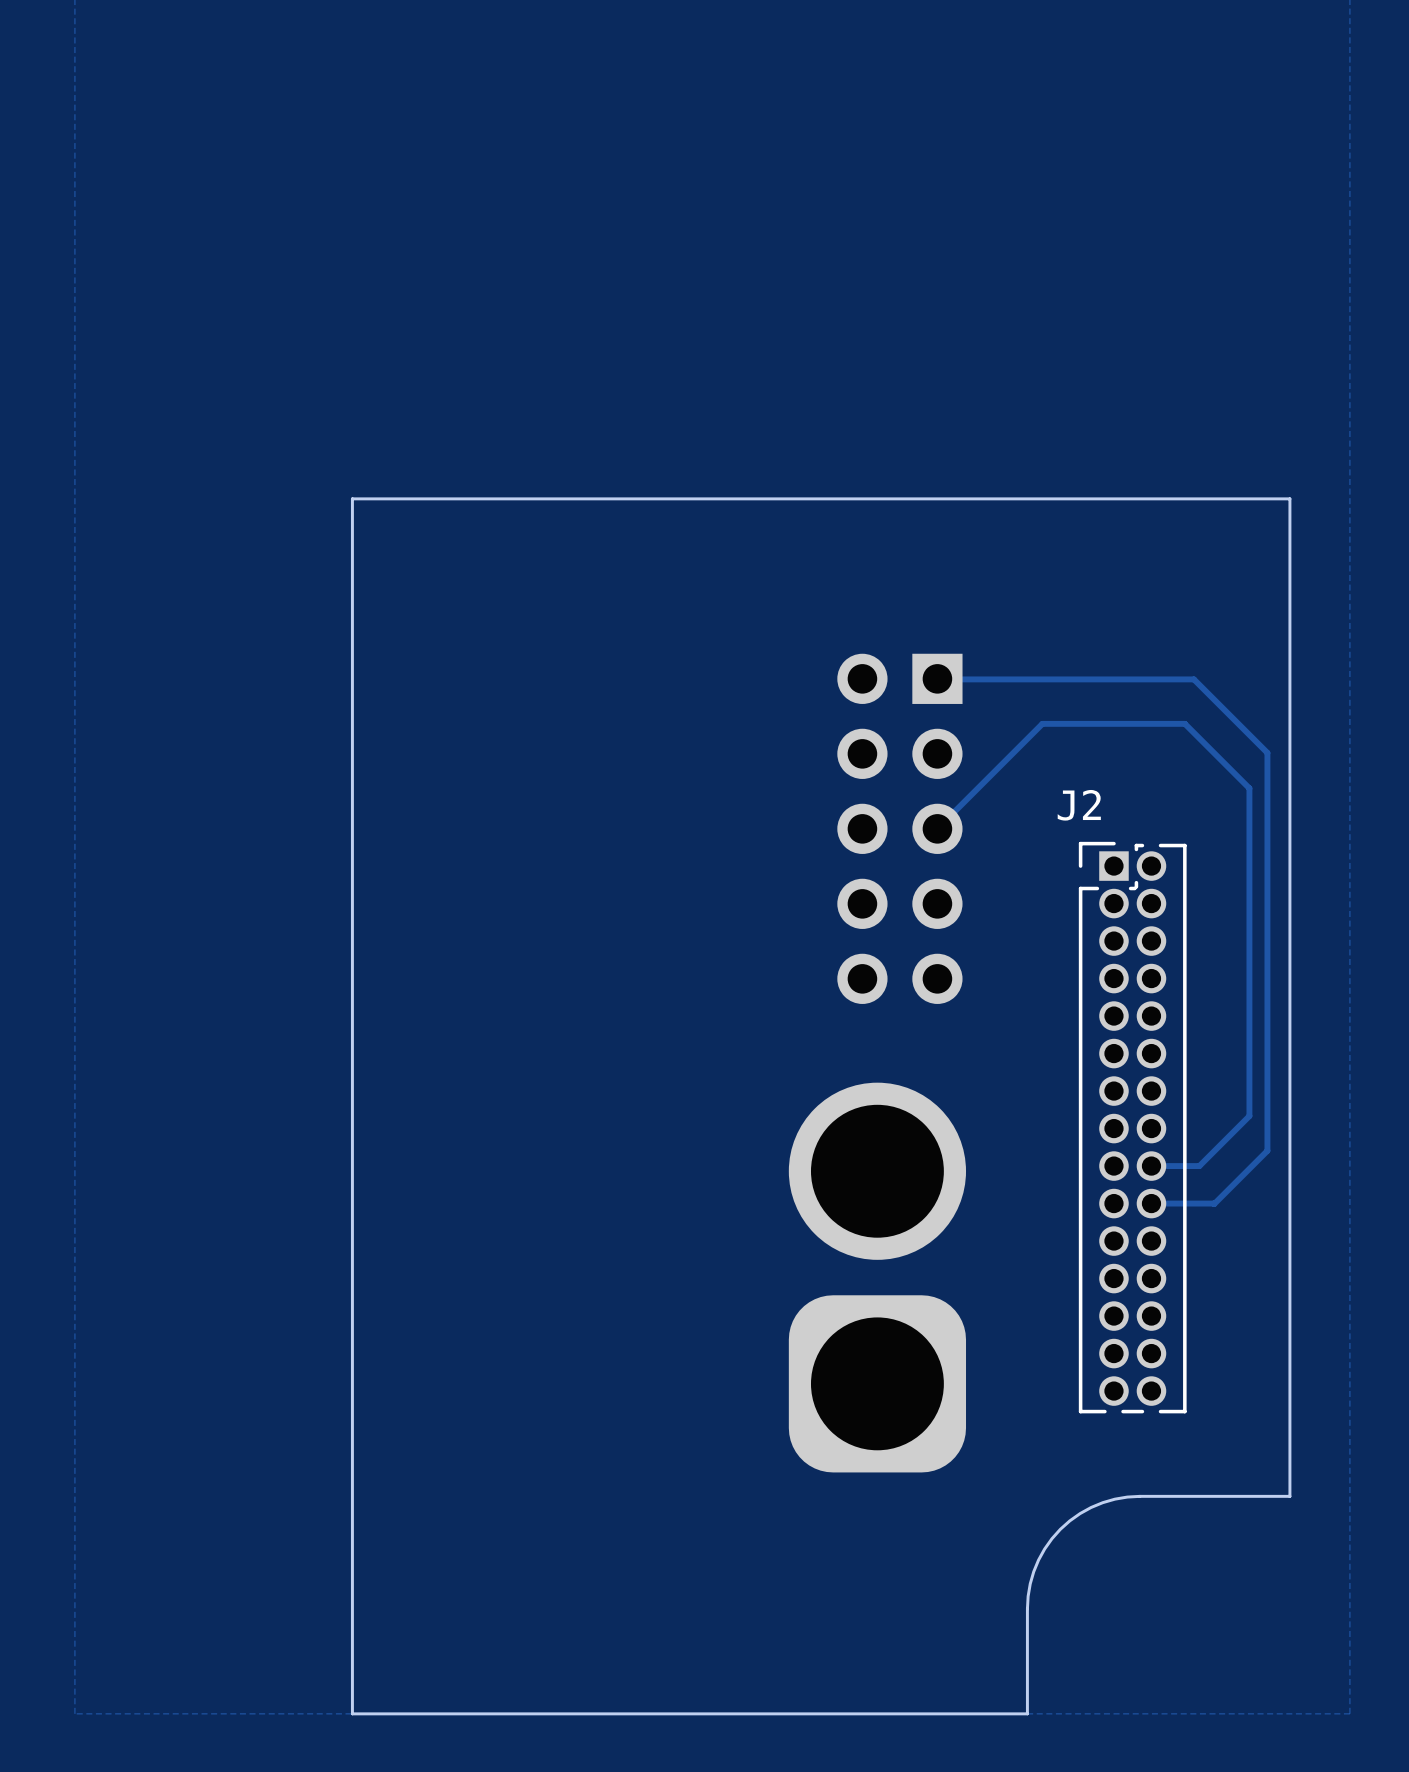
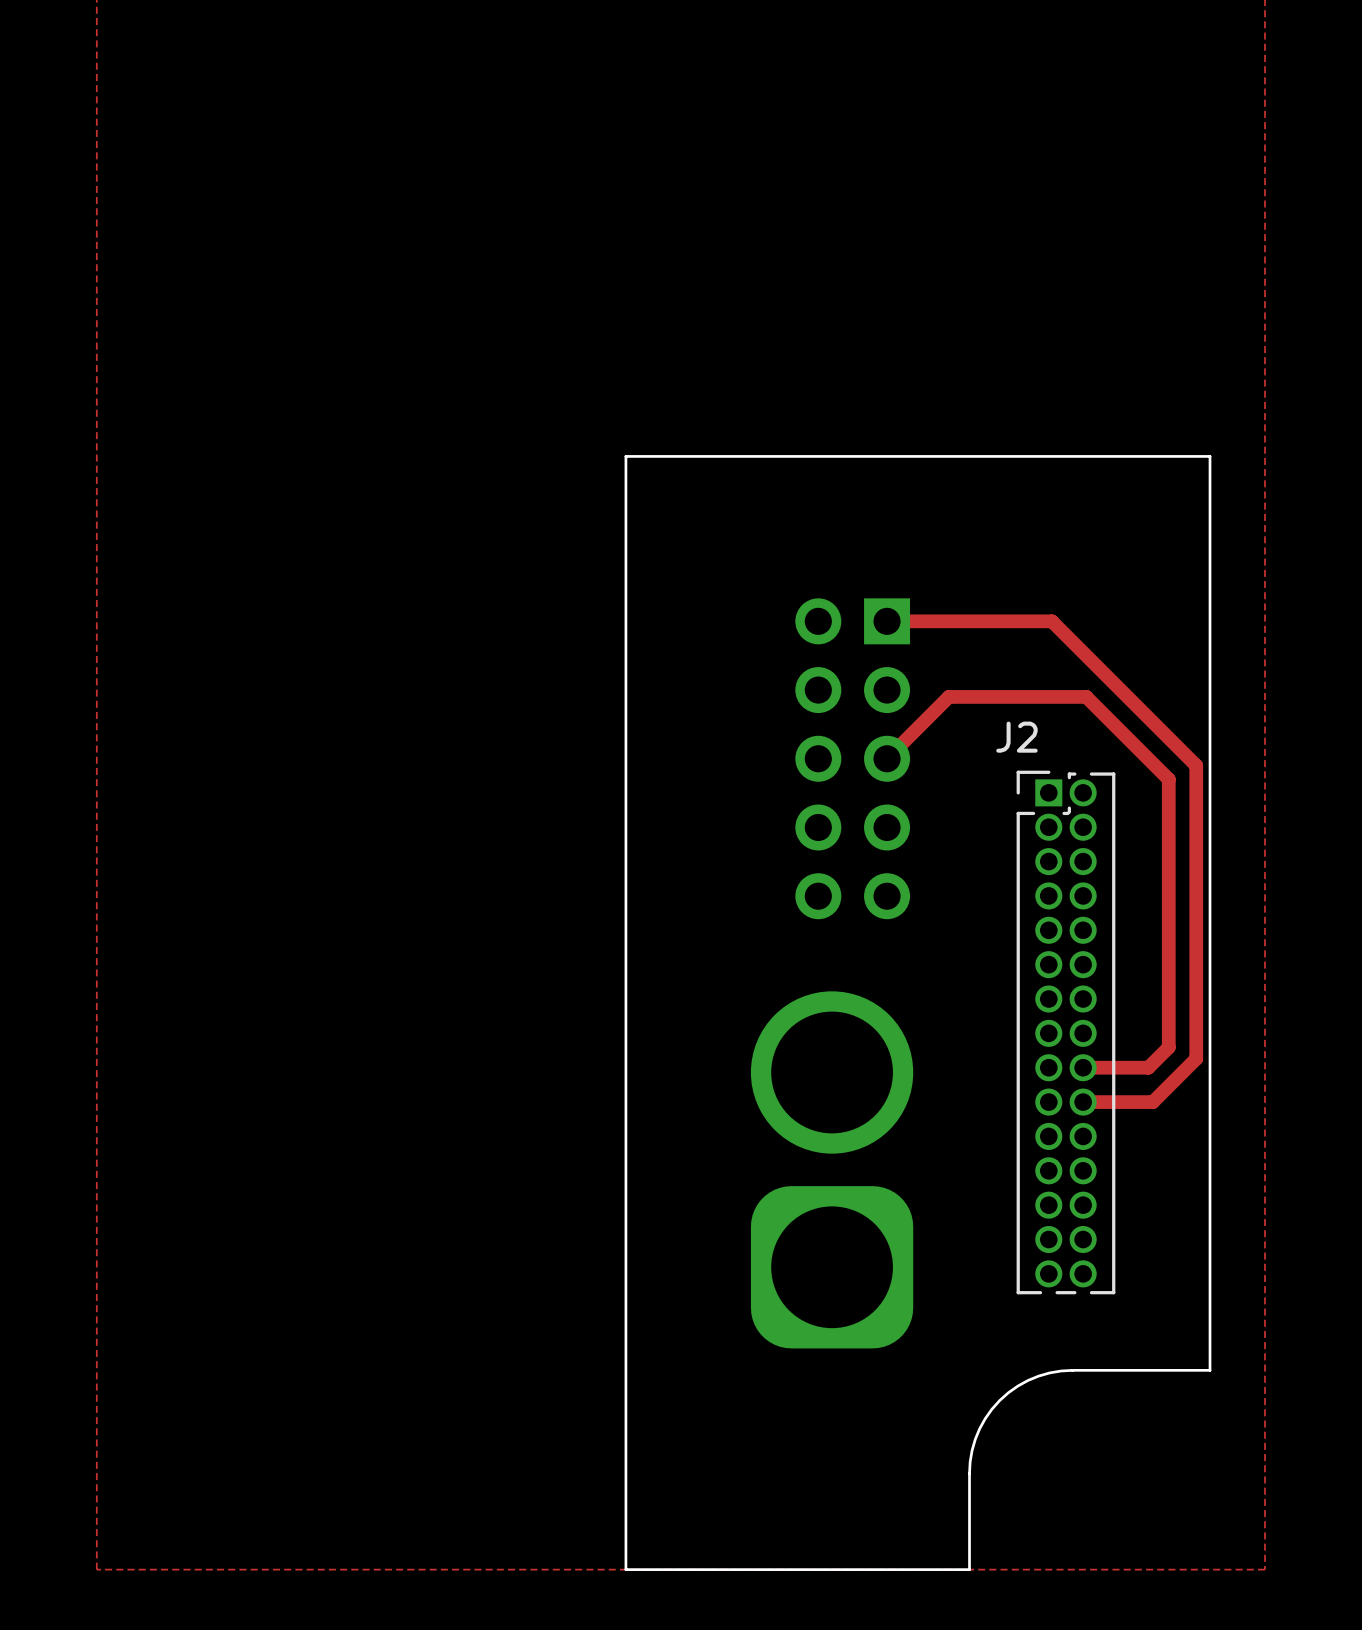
board edge: (652, 498) (352, 498) (352, 1713) (652, 1713) -> (625, 456) (625, 1569)
track: (923, 679) (1193, 679) (1267, 752) (1267, 1150) (1213, 1203) -> (887, 621) (1051, 621) (1196, 765) (1196, 1058) (1152, 1102) (1140, 1102)
track: (1004, 761) (1042, 723) (1184, 723) (1249, 788) (1249, 1116) (1199, 1166) -> (948, 696) (1086, 696) (1168, 779) (1168, 1047) (1148, 1067) (1127, 1067)
track width: thin (1004, 761) (937, 828) -> thick (948, 696) (887, 758)
track width: thin (1151, 1166) (1199, 1166) -> thick (1083, 1067) (1127, 1067)
track width: thin (1151, 1203) (1213, 1203) -> thick (1083, 1102) (1140, 1102)

